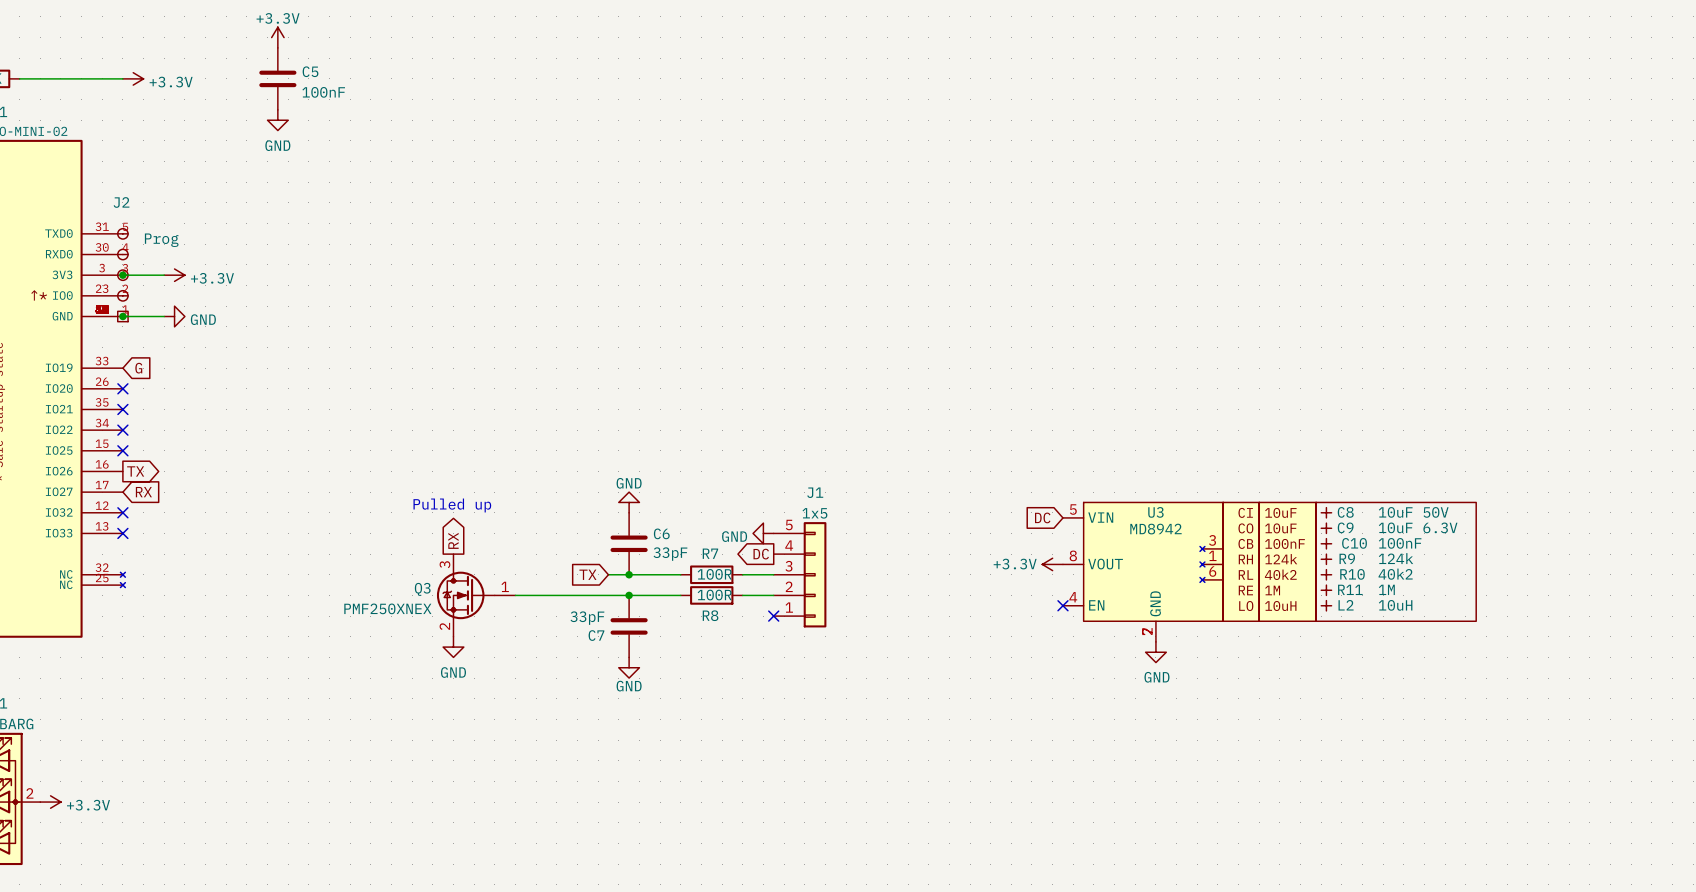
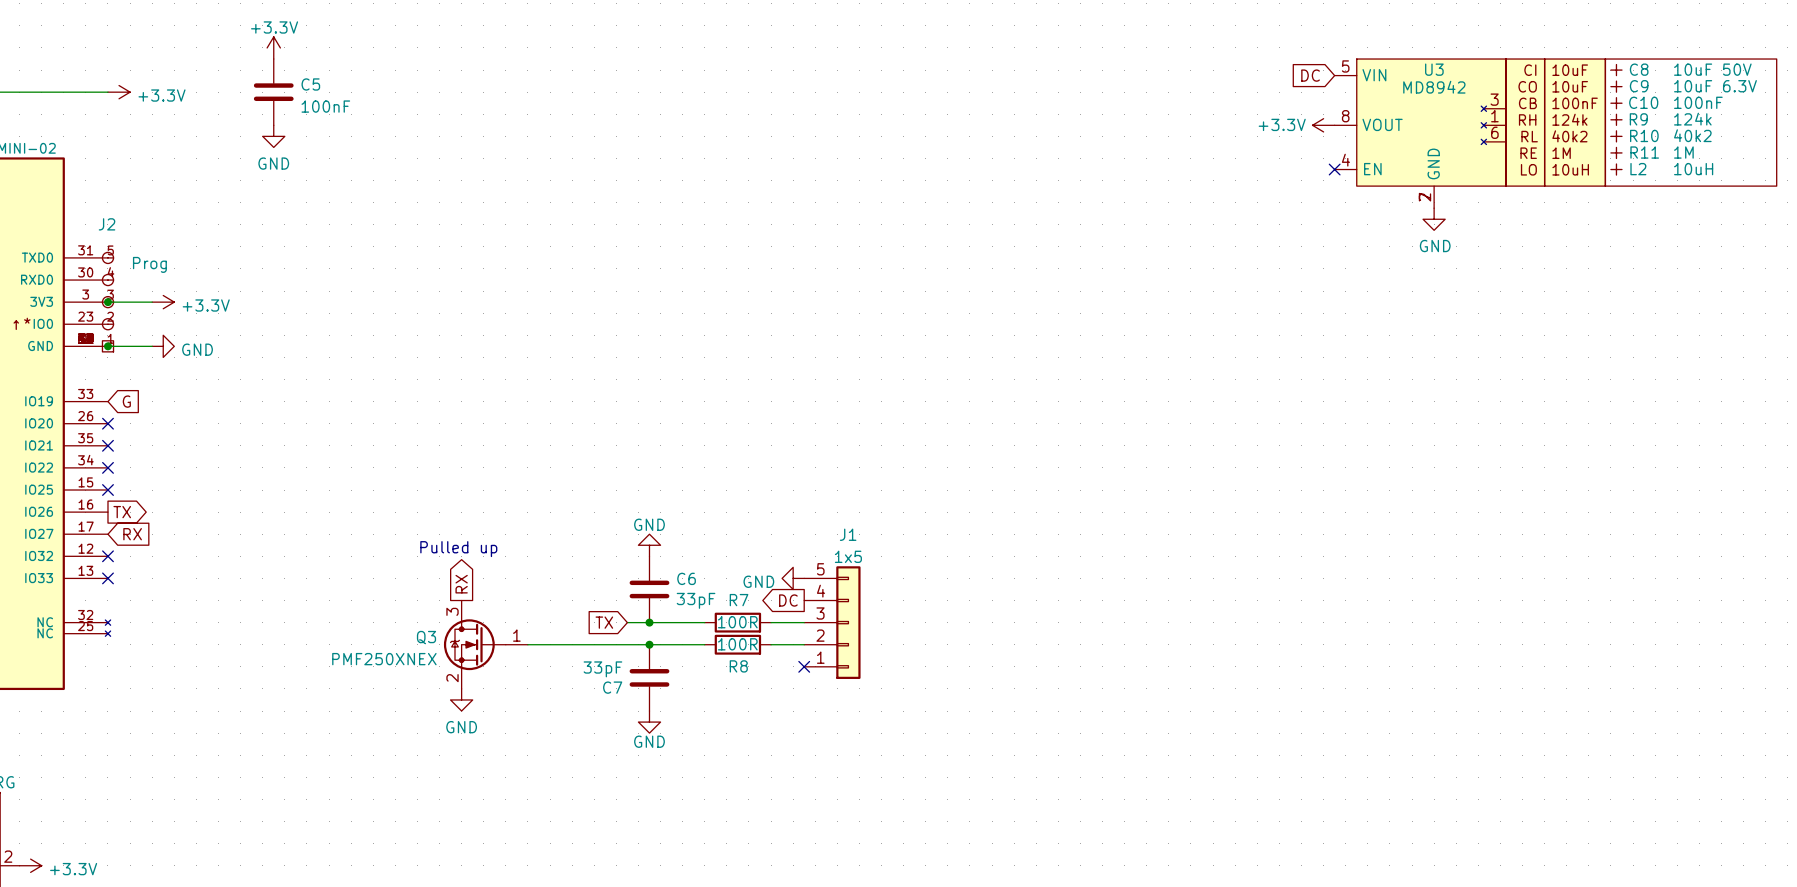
global label: none -> DC (1310, 75)
power symbol: none -> +3.3V (1323, 125)
no-connect mark: none -> (1334, 169)
power symbol: none -> GND (1434, 219)
C8 position: (1326, 512) -> (1616, 70)
global label: DC (1042, 517) -> none
C9 position: (1326, 528) -> (1616, 86)
C10 position: (1326, 543) -> (1616, 103)
R9 position: (1326, 559) -> (1616, 119)
power symbol: +3.3V (1052, 564) -> none
U3 position: (1269, 572) -> (1555, 133)
R10 position: (1326, 574) -> (1616, 136)
R11 position: (1326, 590) -> (1616, 152)
no-connect mark: (1062, 605) -> none
L2 position: (1326, 605) -> (1616, 169)
power symbol: GND (1155, 652) -> none

